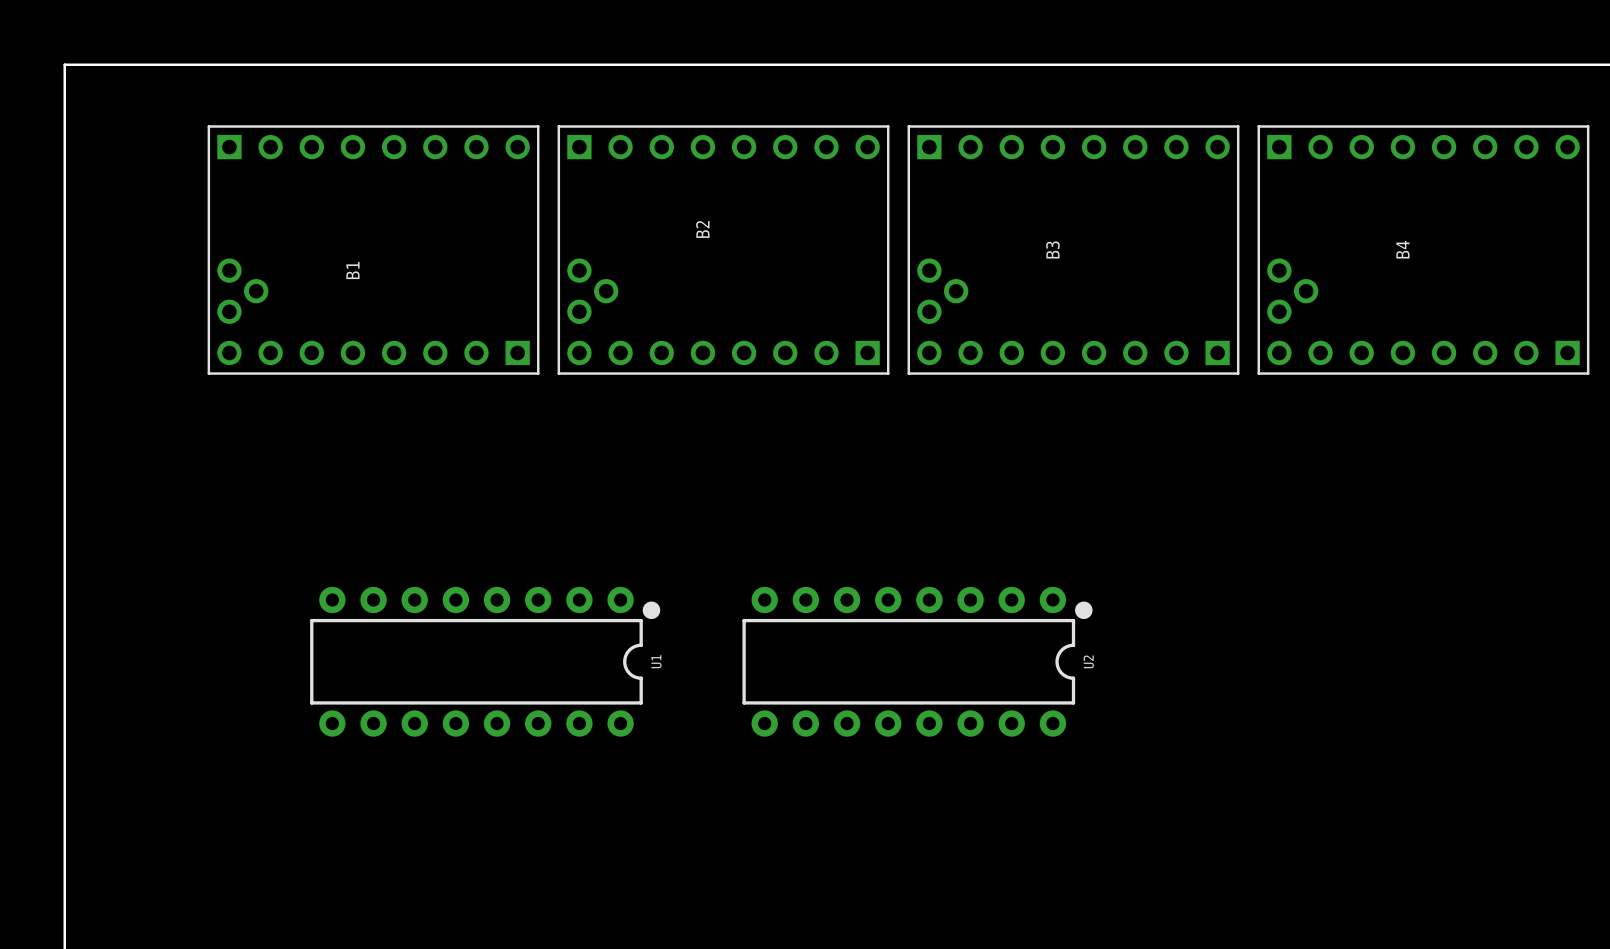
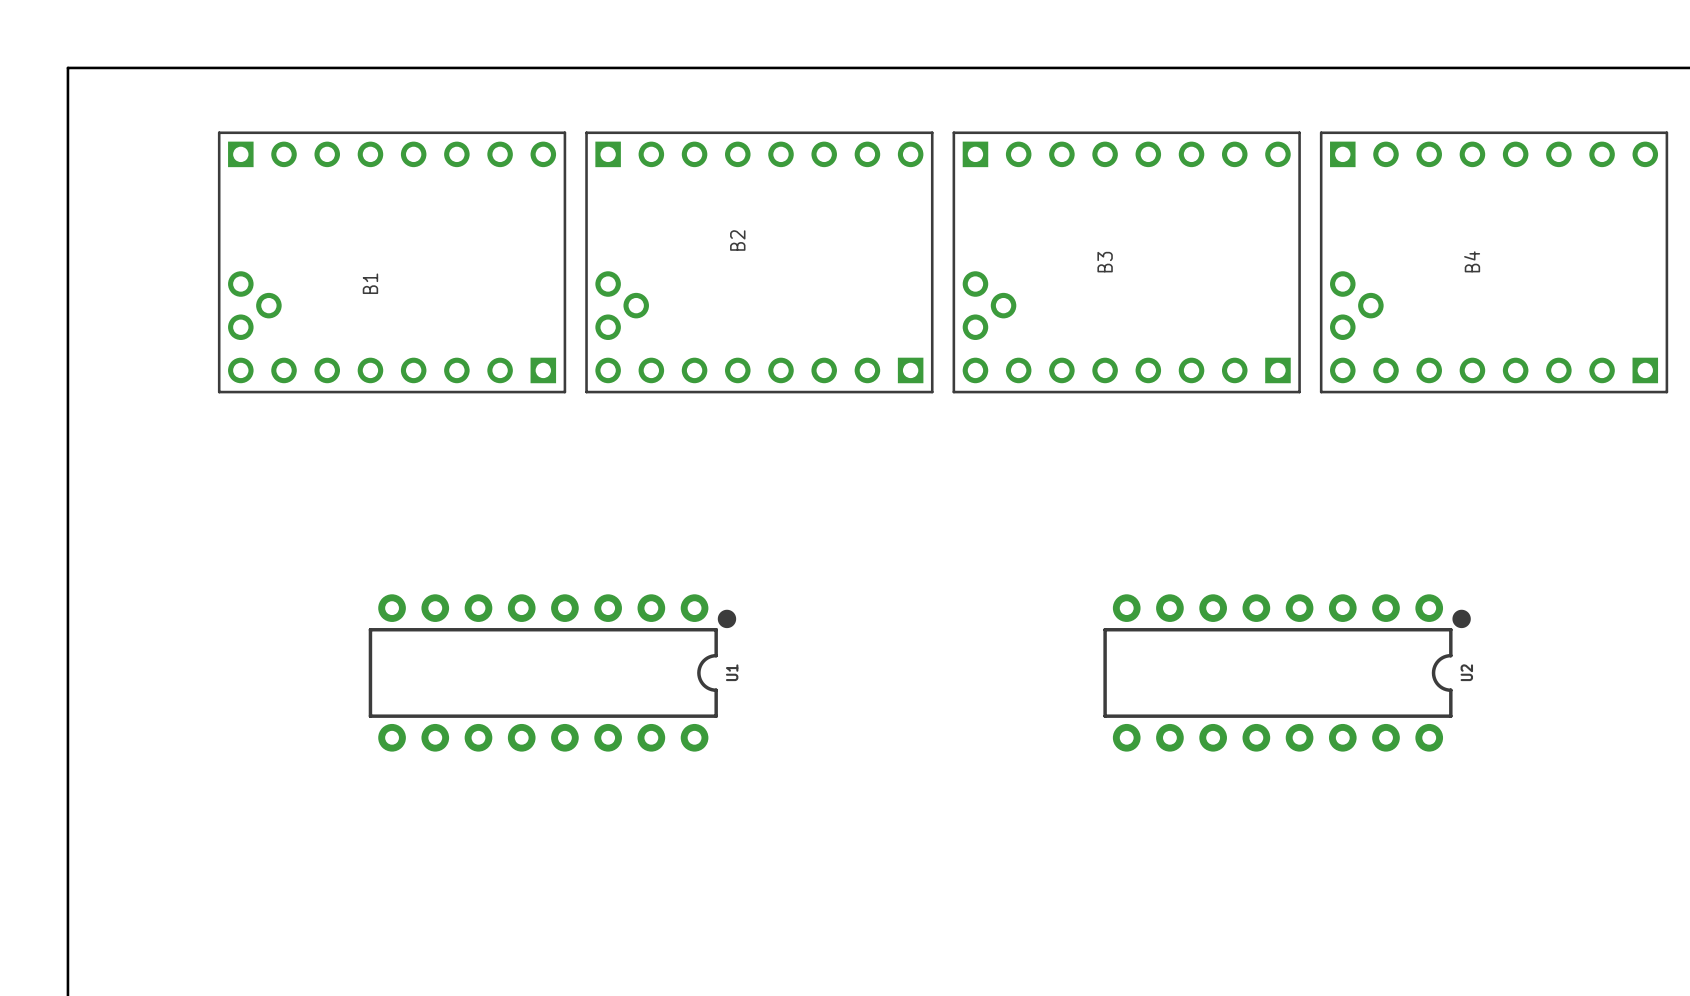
U1 position: (485, 661) -> (552, 672)
U2 position: (917, 661) -> (1287, 672)

